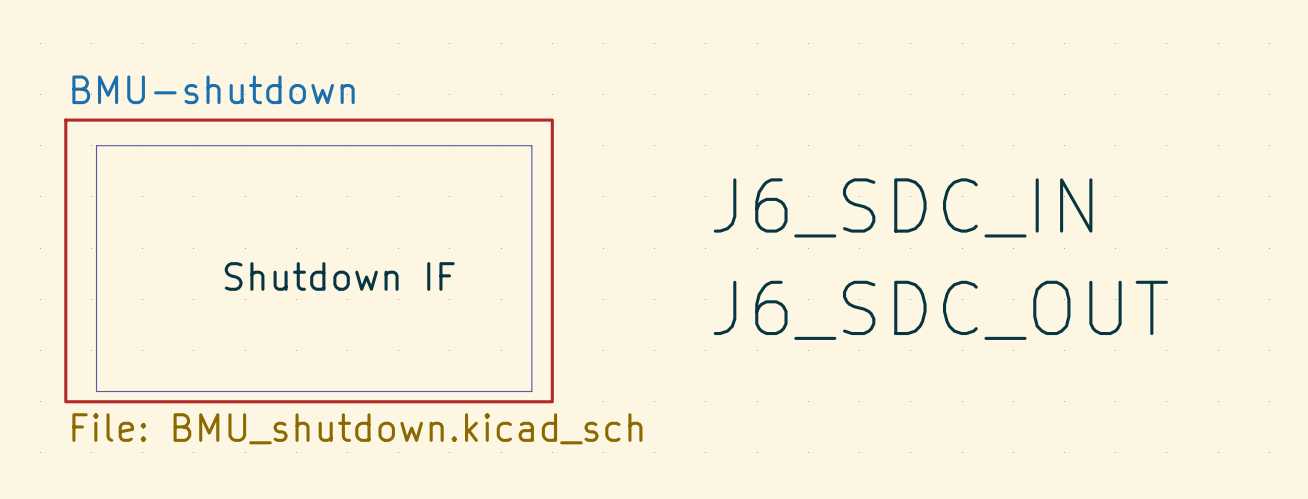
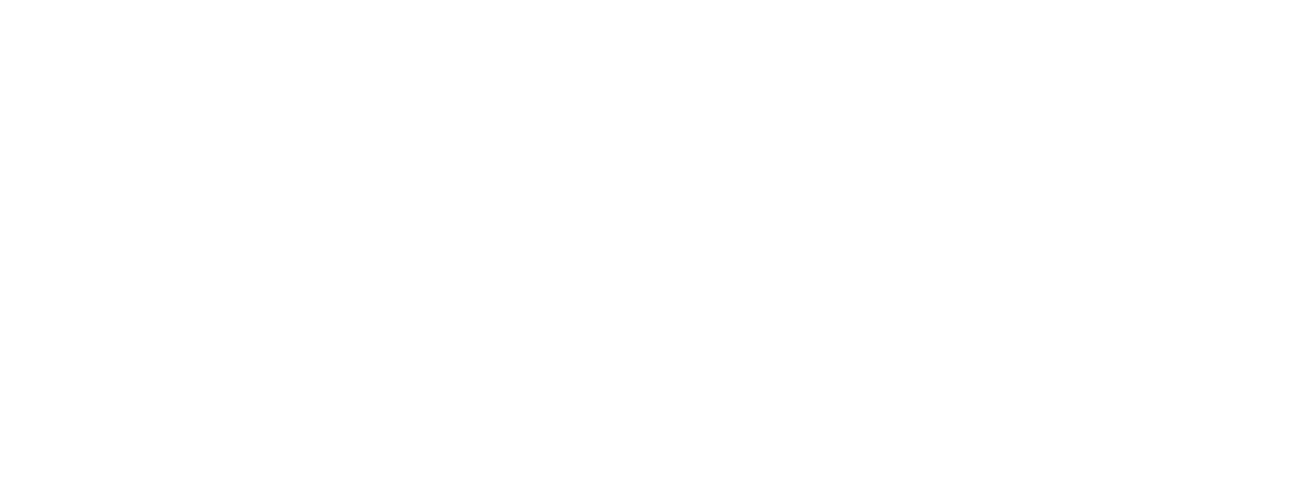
line: (96, 145) (531, 145) (531, 391) (96, 391) (96, 145) -> none
label: J6_SDC_IN (903, 207) -> none
sheet BMU-shutdown: File: BMU_shutdown.kicad_sch (309, 260) -> none
label: Shutdown IF (339, 276) -> none
label: J6_SDC_OUT (940, 310) -> none

